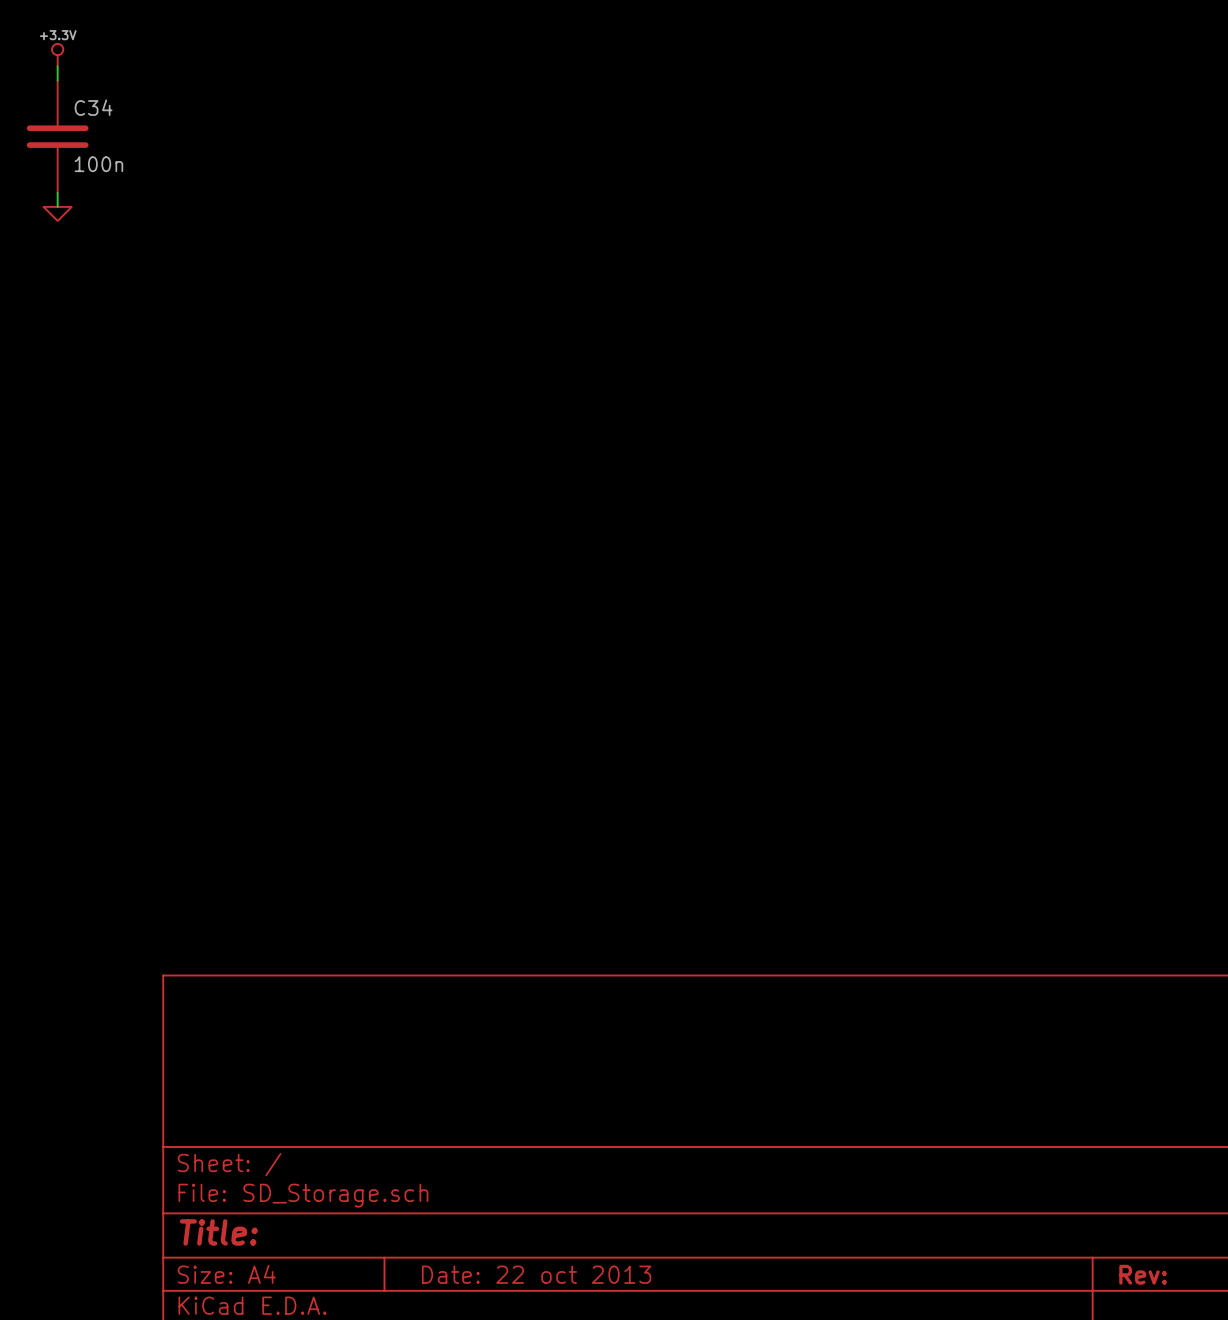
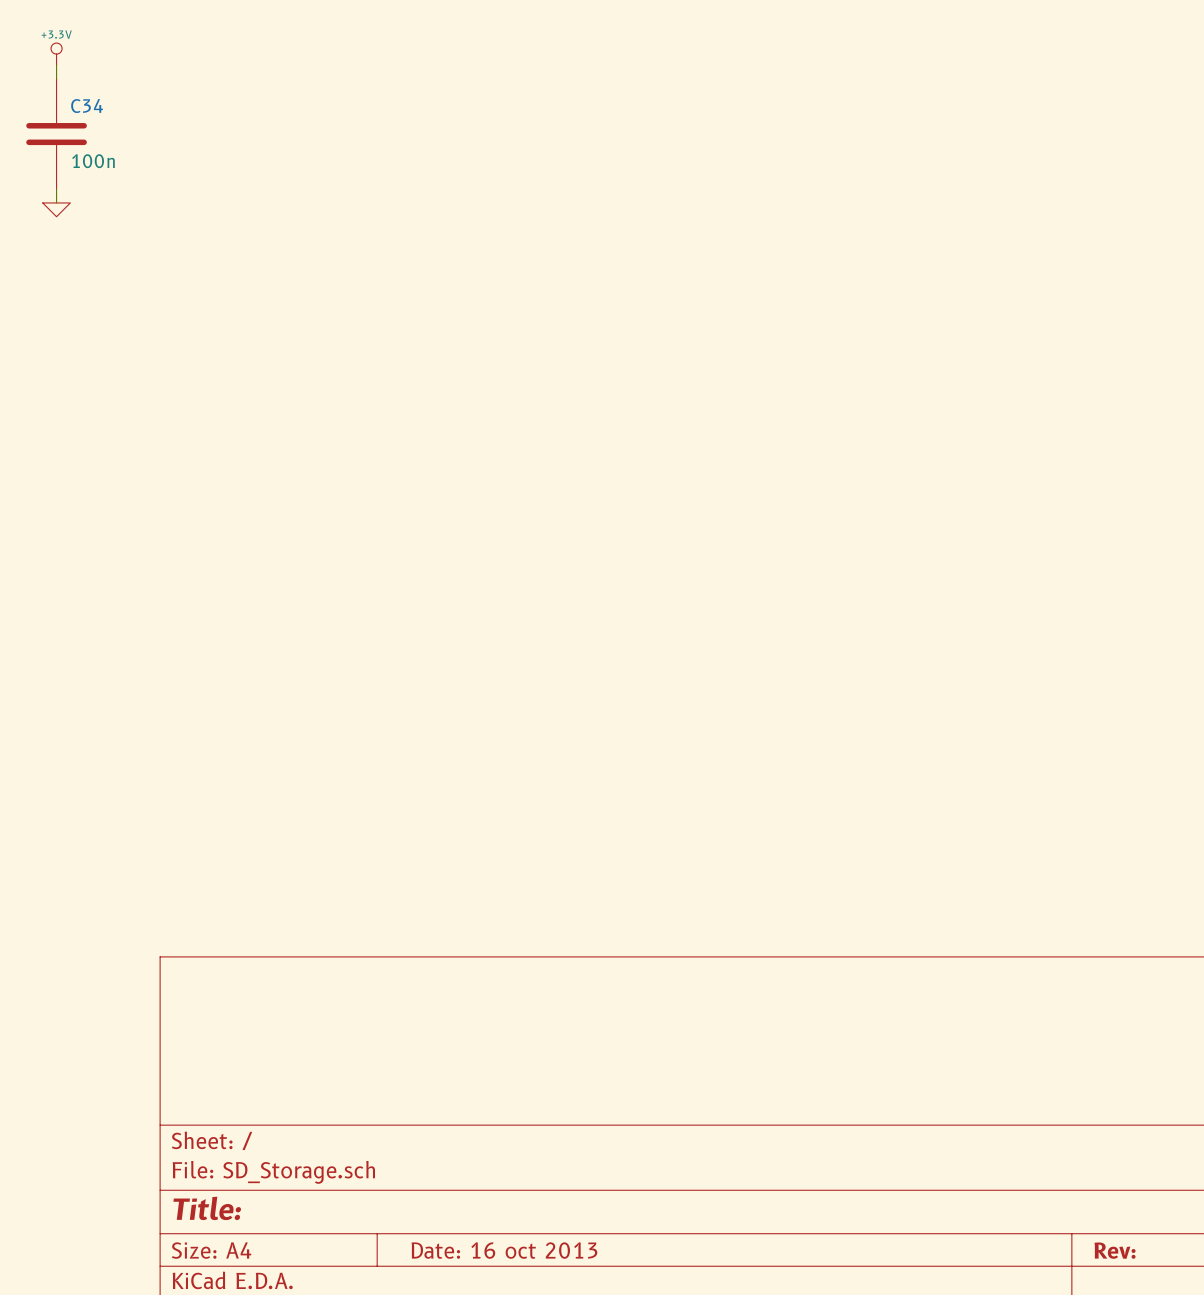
title block: Date: 22 oct 2013 (536, 1274) -> Date: 16 oct 2013 (504, 1250)

